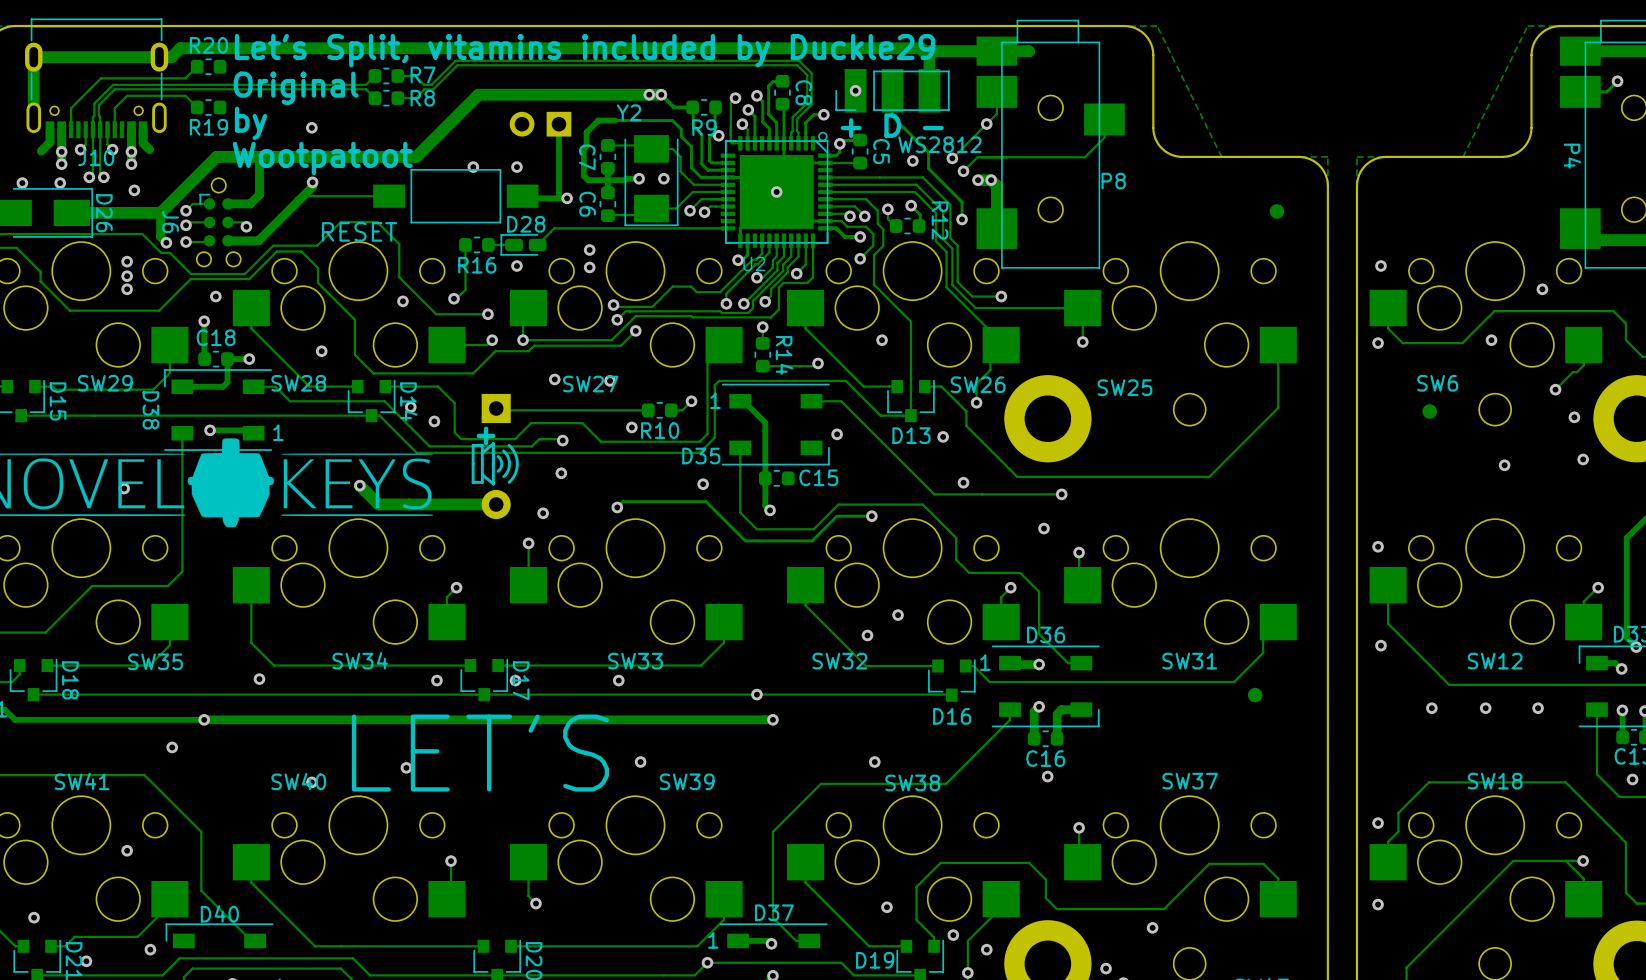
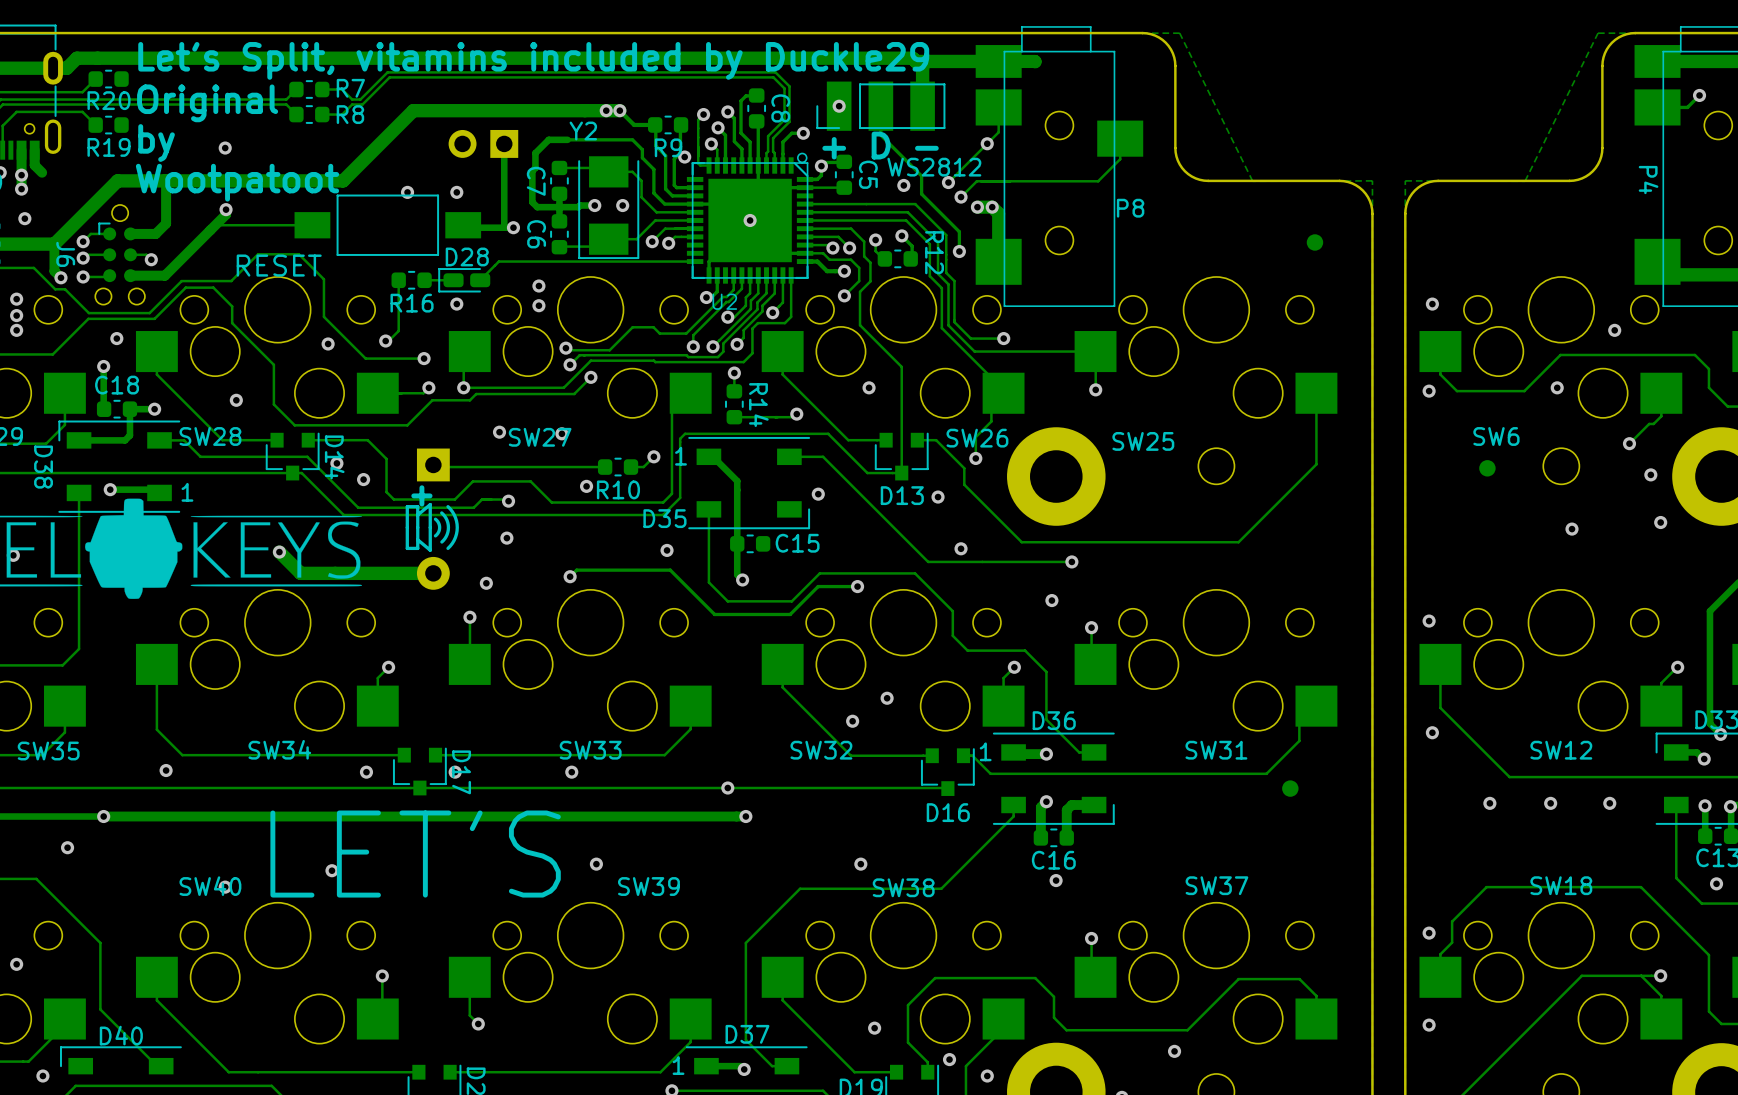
R20 name position: R20 (208, 45) -> R20 (109, 100)

